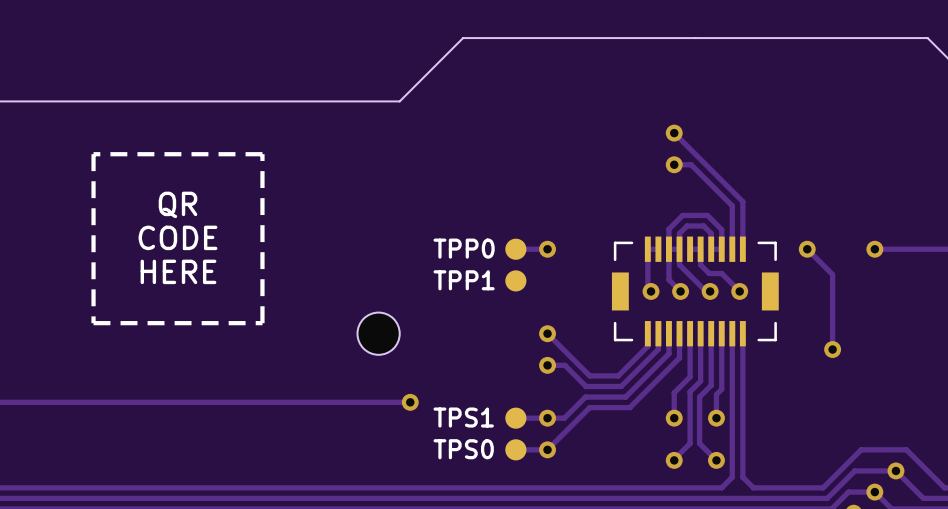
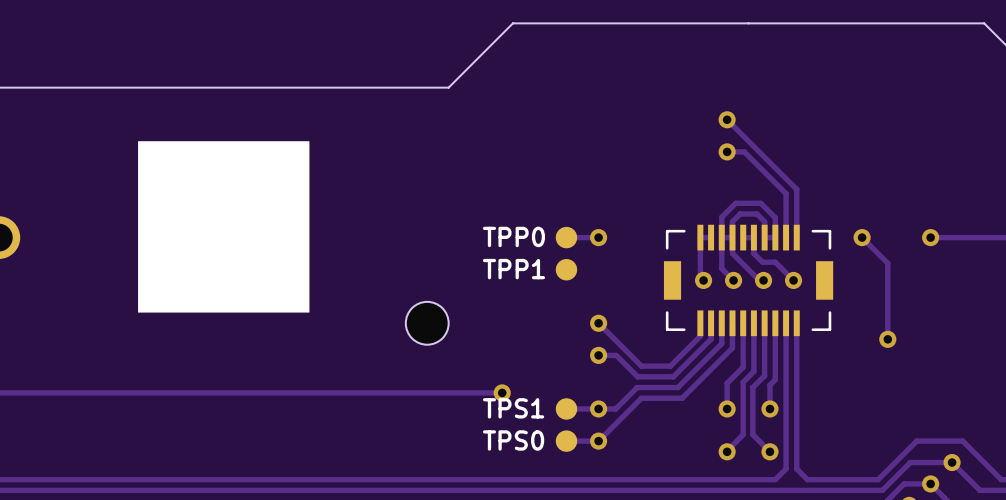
drawing: none -> [138, 141, 310, 313]
line: (262, 154) (93, 154) (93, 323) (262, 323) (262, 154) -> none
text: QR (178, 204) -> none
text: CODE (178, 237) -> none
text: HERE (178, 271) -> none
via position: (410, 402) -> (502, 392)
track: none -> (502, 392) (459, 392)

